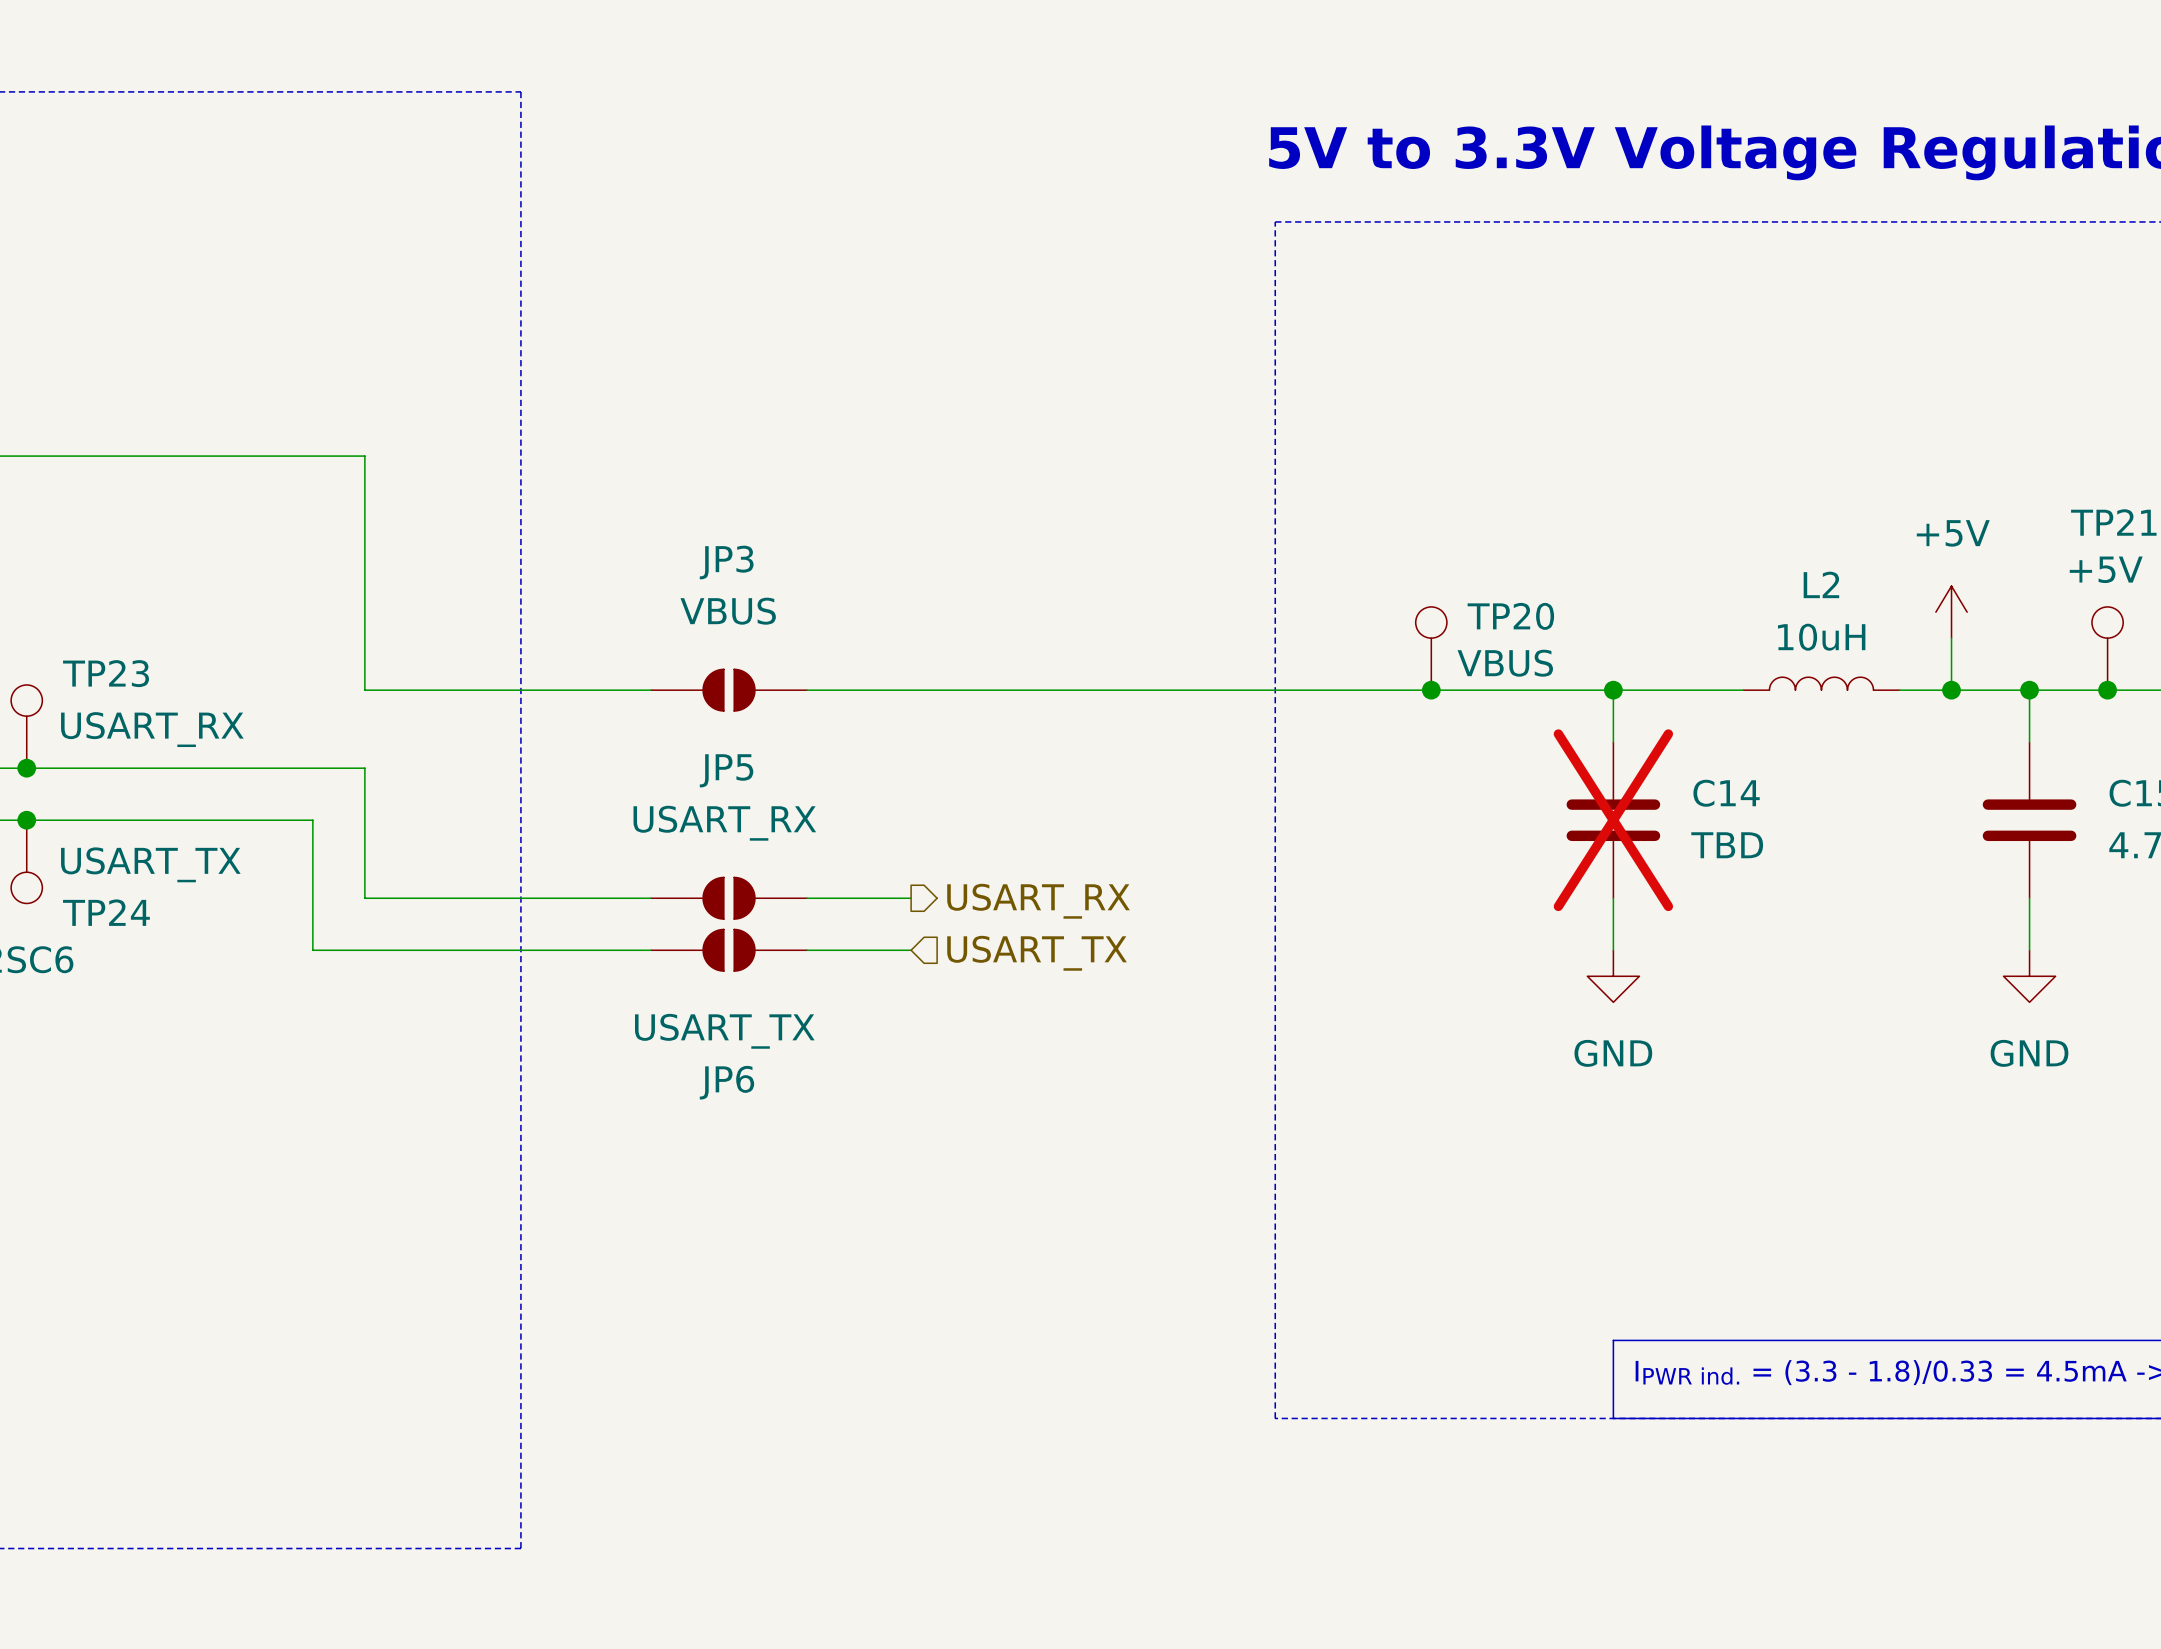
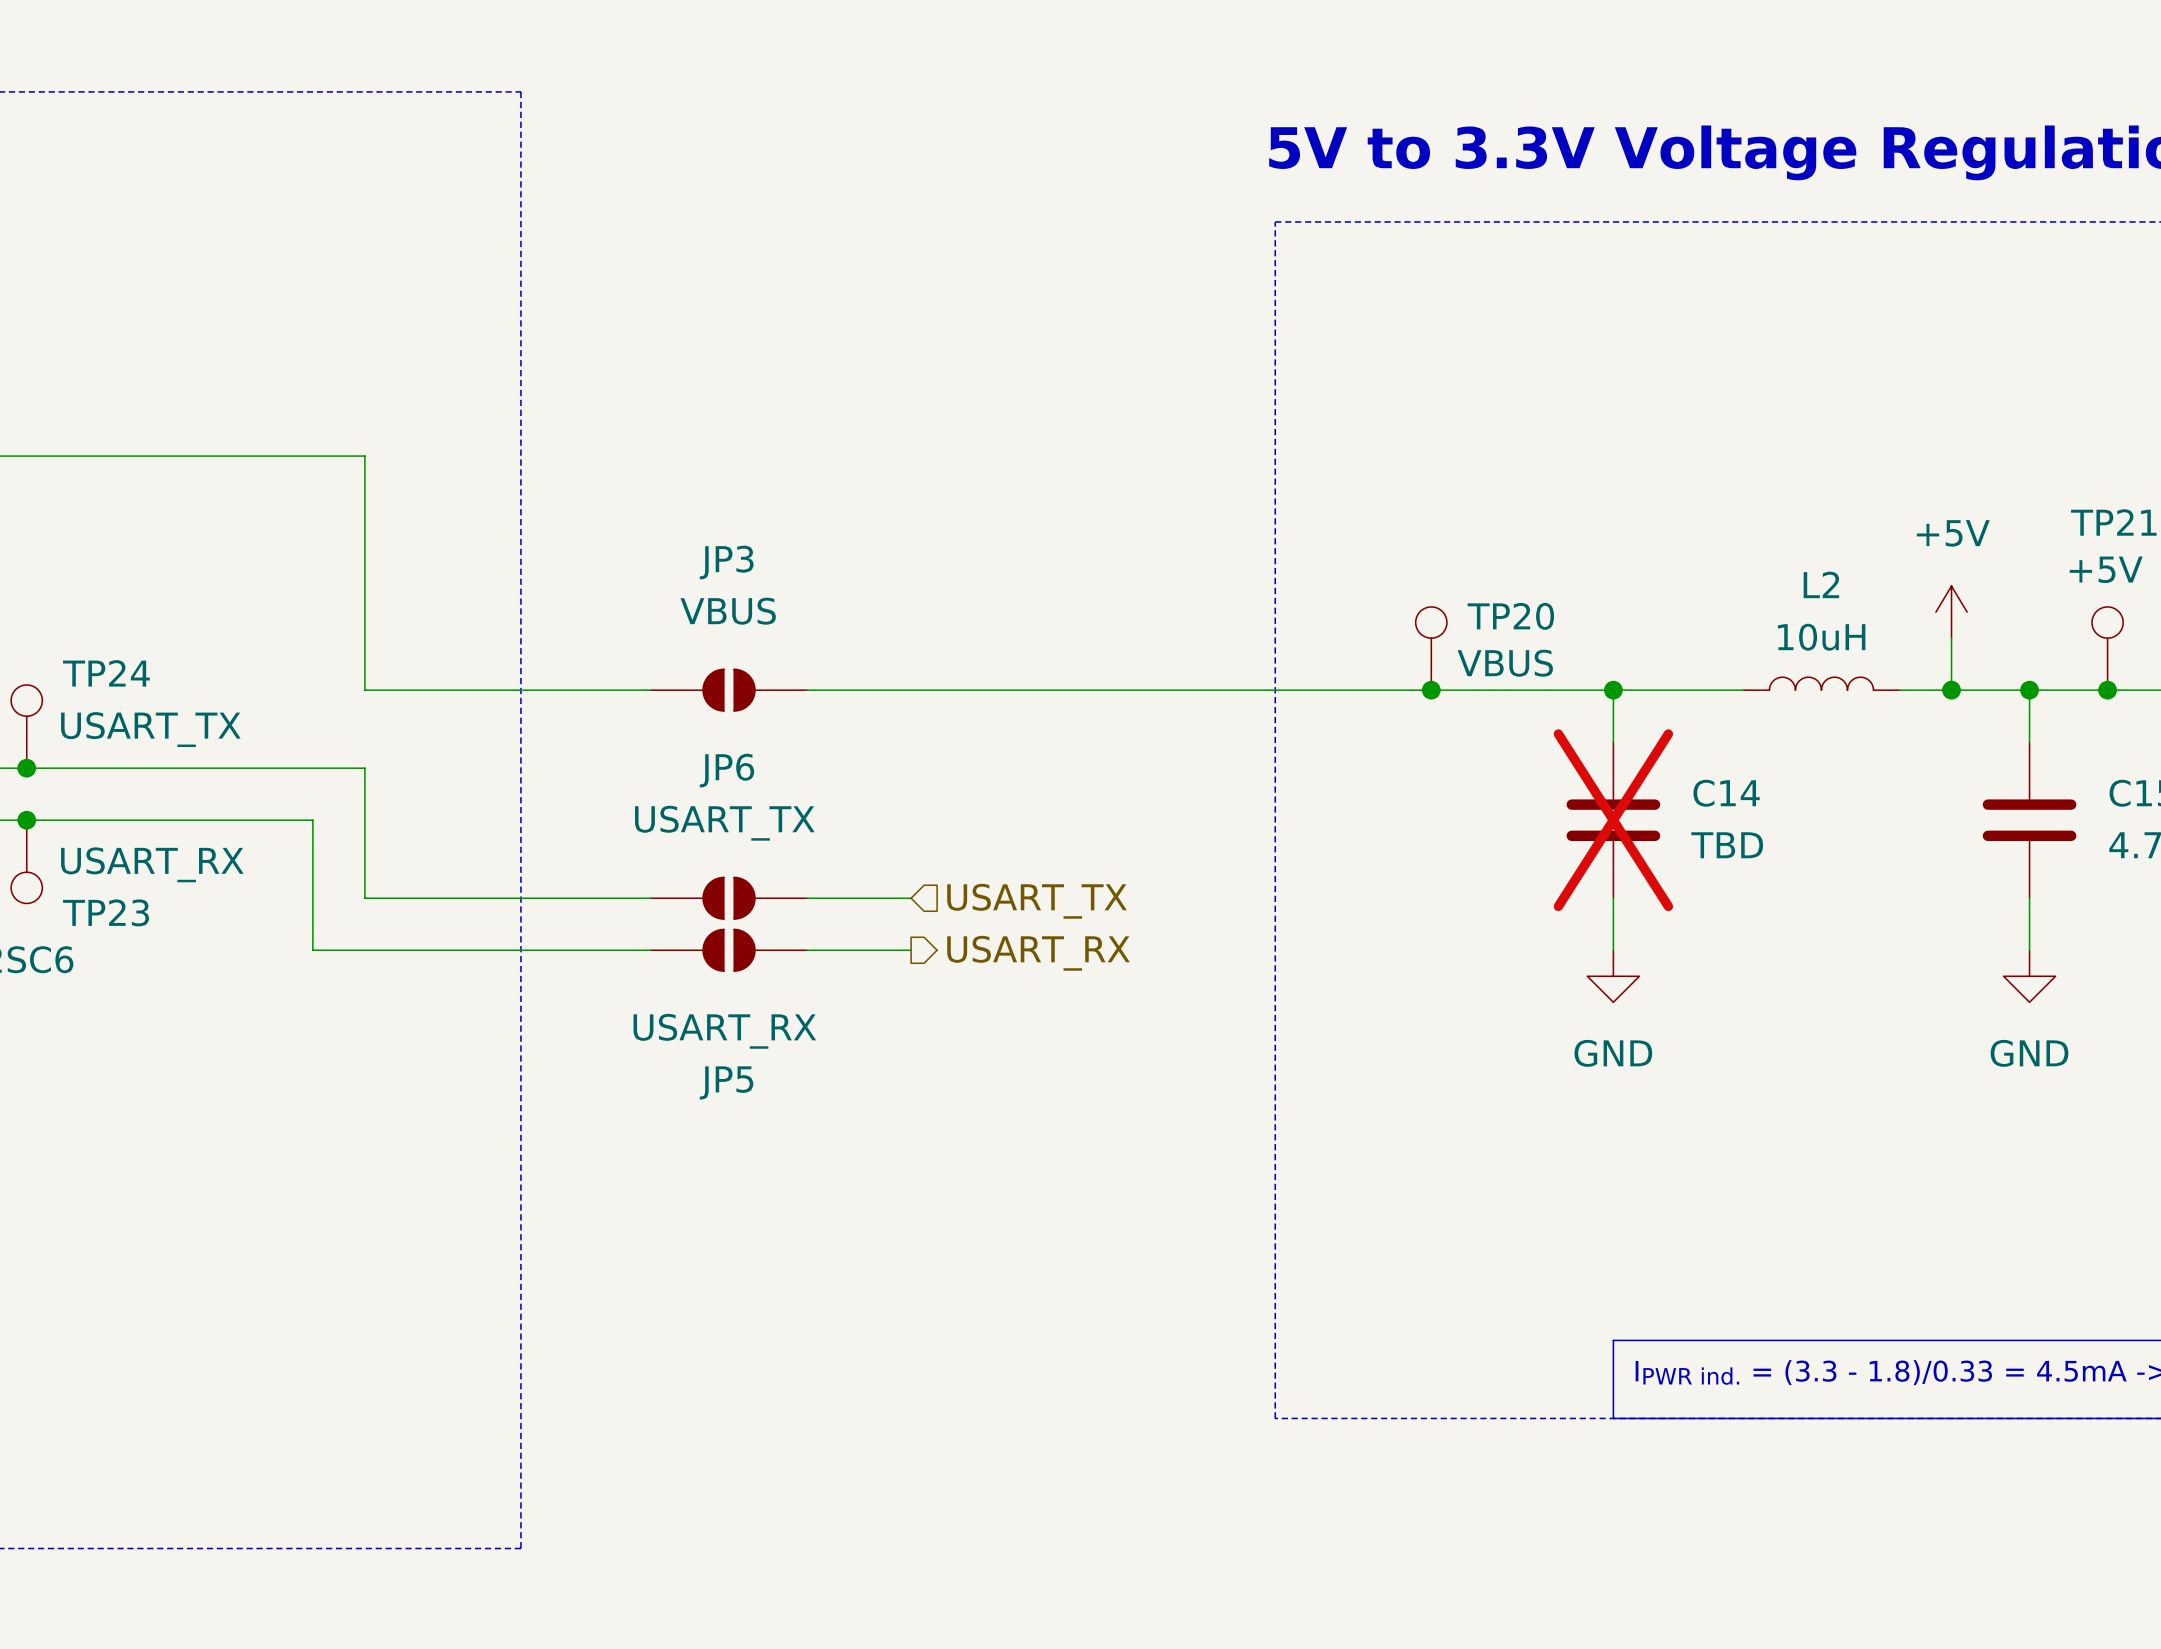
TP23 name: TP23 (106, 673) -> TP24 (106, 673)
TP23 value: USART_RX (152, 729) -> USART_TX (150, 729)
JP5 name: JP5 (726, 770) -> JP6 (726, 770)
JP5 value: USART_RX (724, 823) -> USART_TX (724, 823)
TP24 value: USART_TX (150, 864) -> USART_RX (152, 864)
hierarchical label shape: output (1038, 901) -> input (1037, 901)
hierarchical label: USART_RX (1038, 901) -> USART_TX (1037, 901)
TP24 name: TP24 (106, 912) -> TP23 (106, 912)
hierarchical label shape: input (1037, 953) -> output (1038, 953)
hierarchical label: USART_TX (1037, 953) -> USART_RX (1038, 953)
JP6 value: USART_TX (724, 1031) -> USART_RX (724, 1031)
JP6 name: JP6 (726, 1082) -> JP5 (726, 1082)

